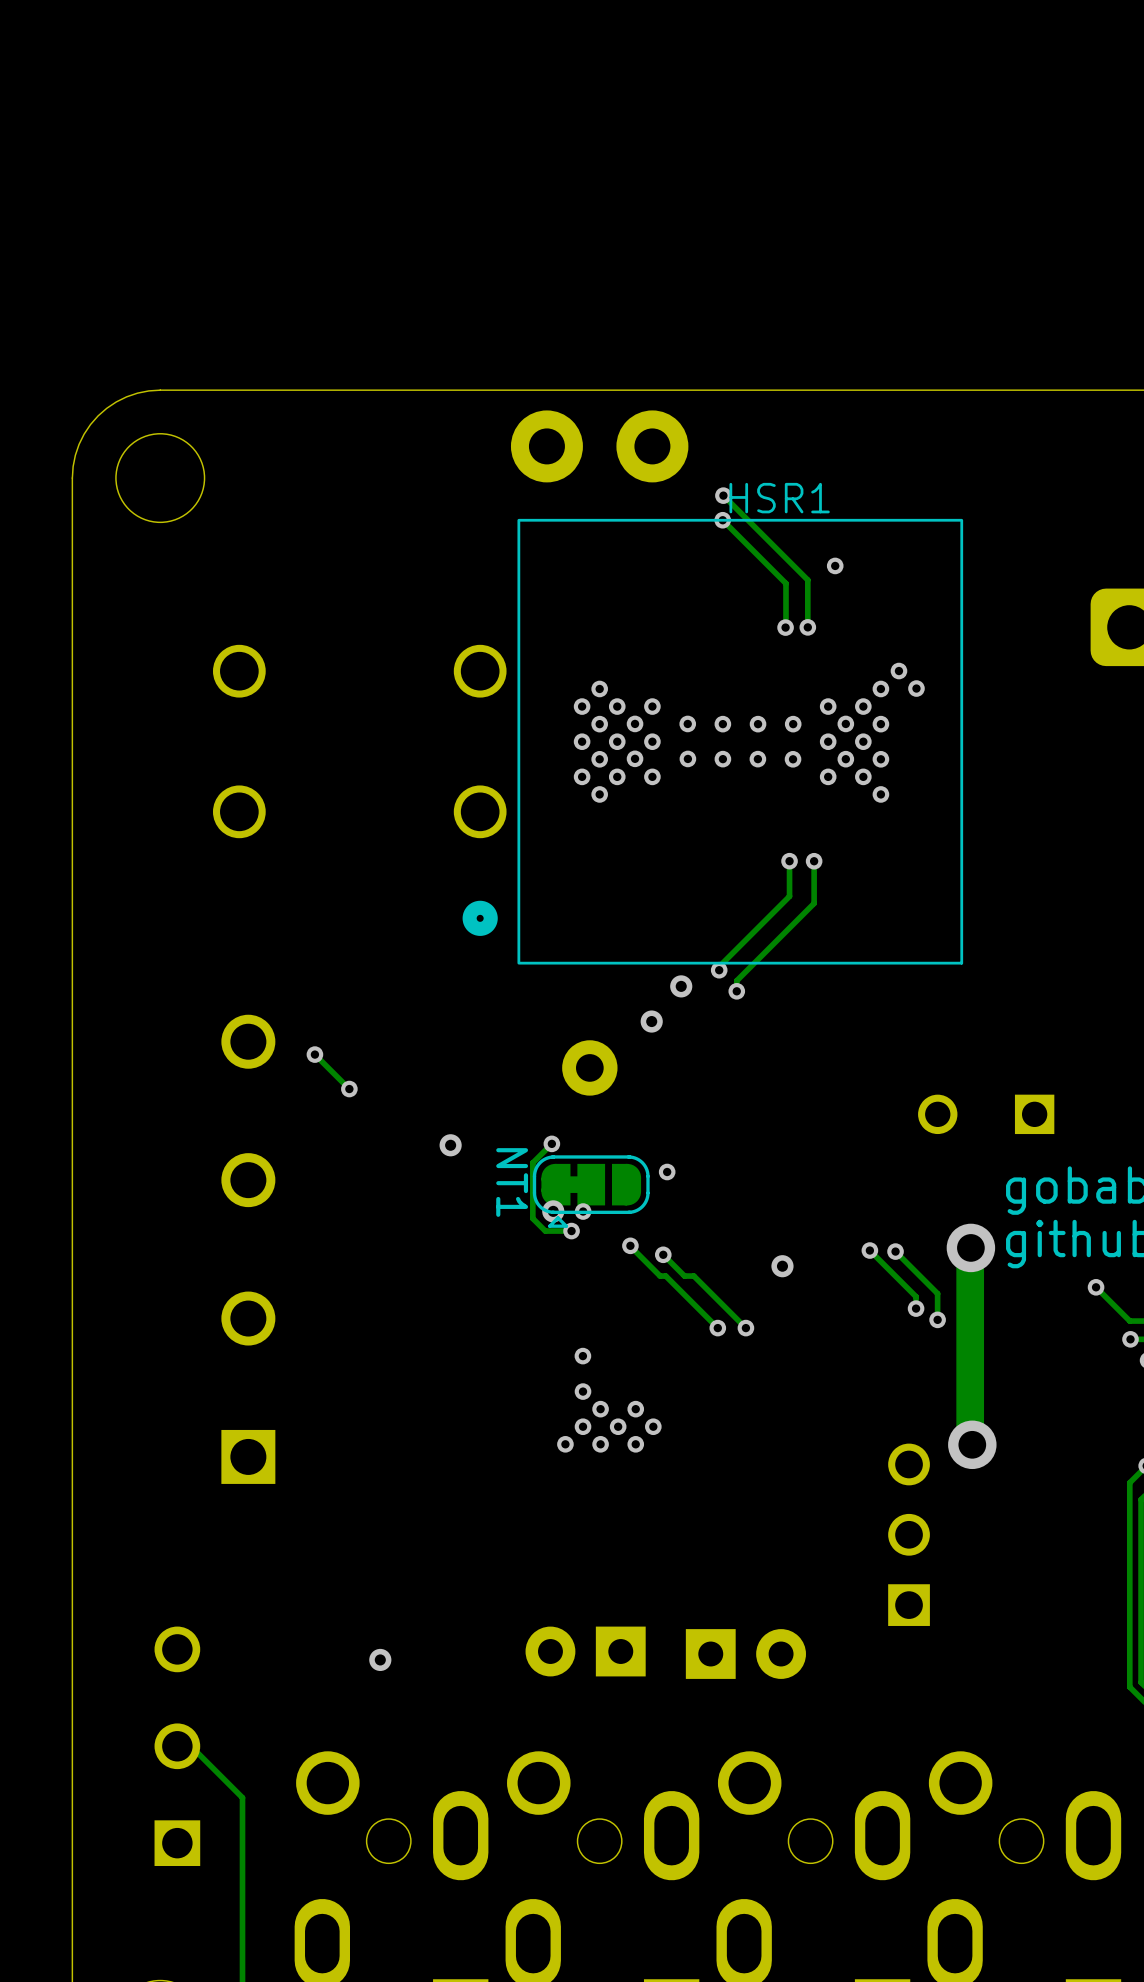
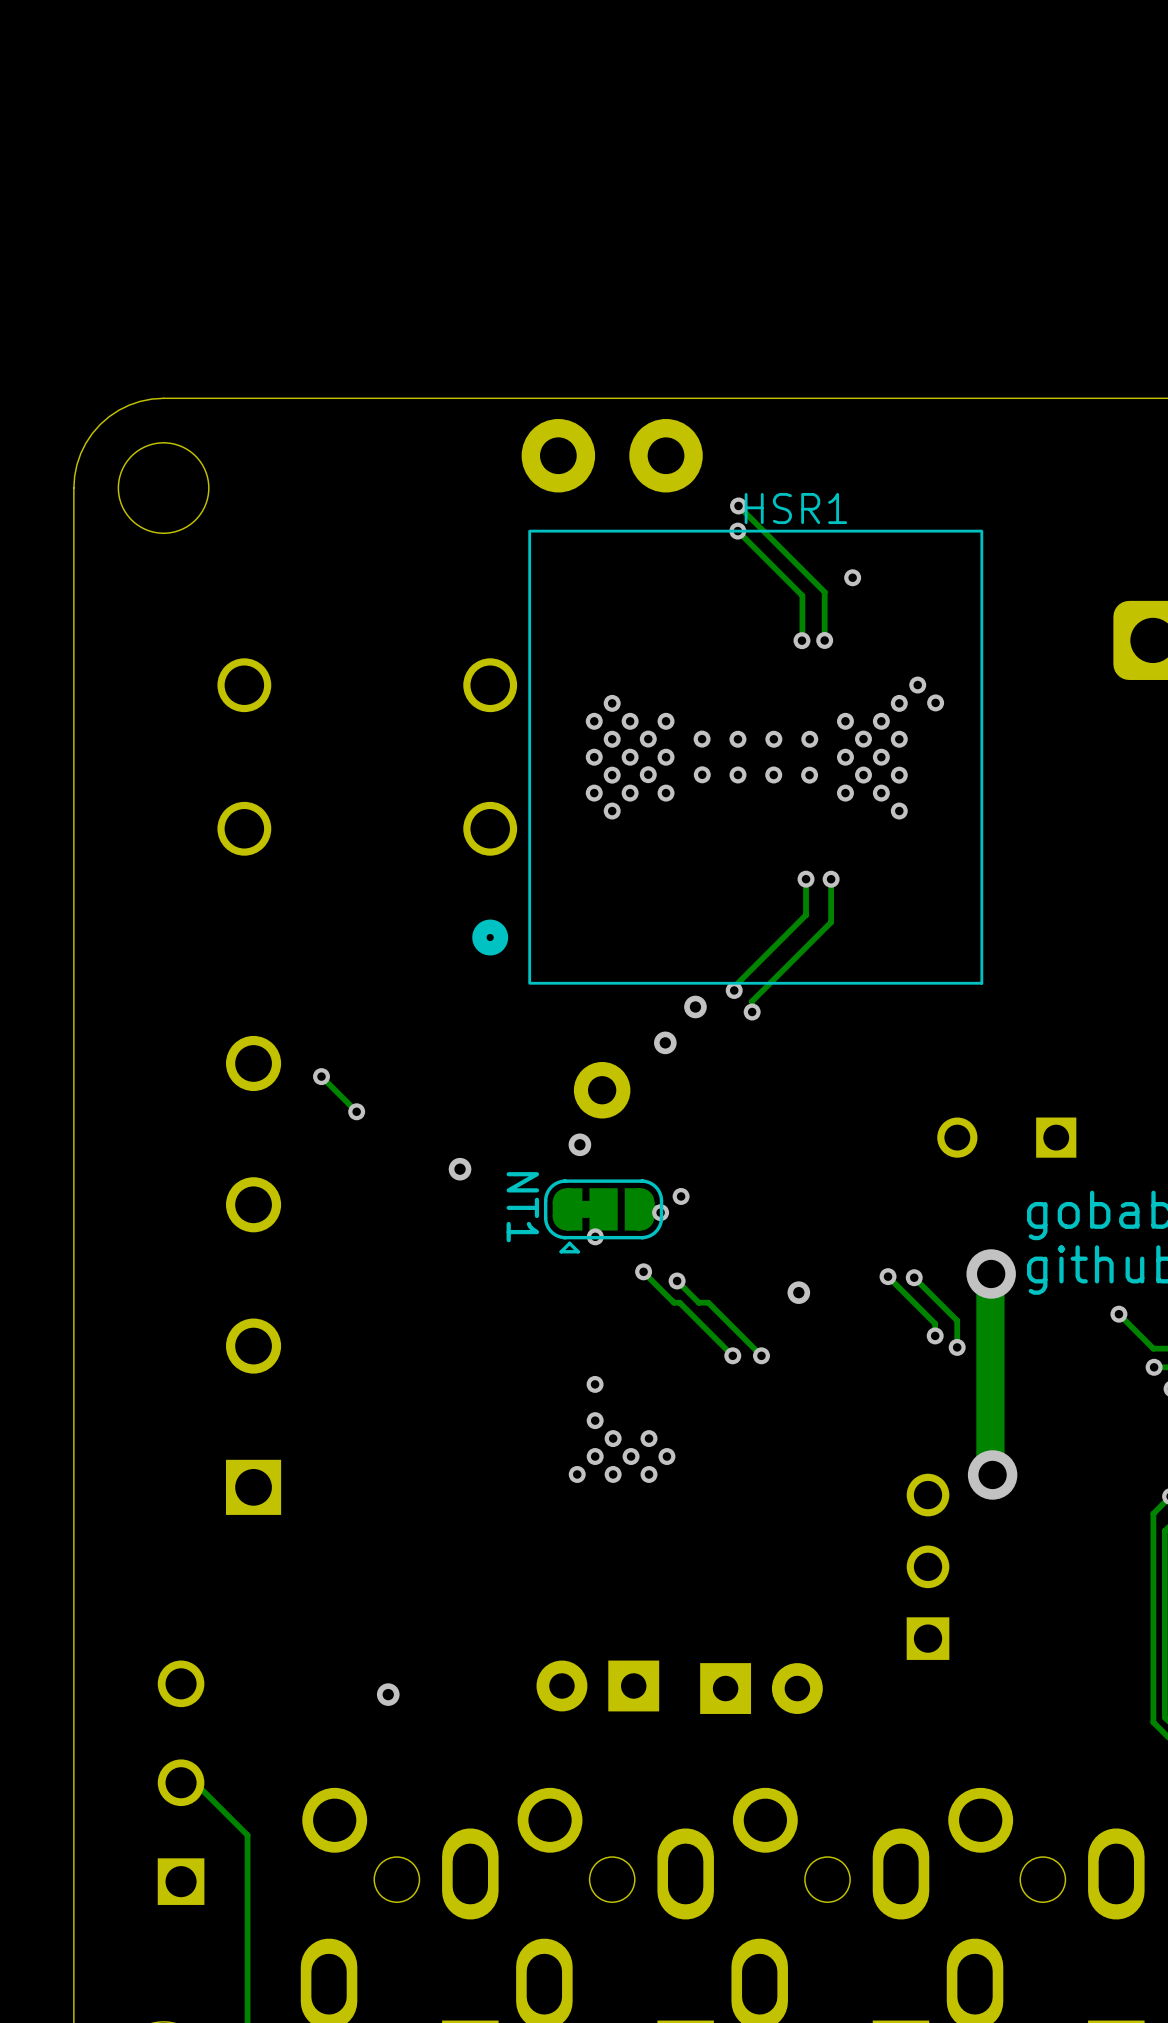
track: (551, 1143) (532, 1162) (532, 1218) (545, 1231) (571, 1231) -> none
via: (551, 1143) -> none
via: none -> (660, 1212)
via position: (553, 1211) -> (579, 1144)
via: (571, 1231) -> none

